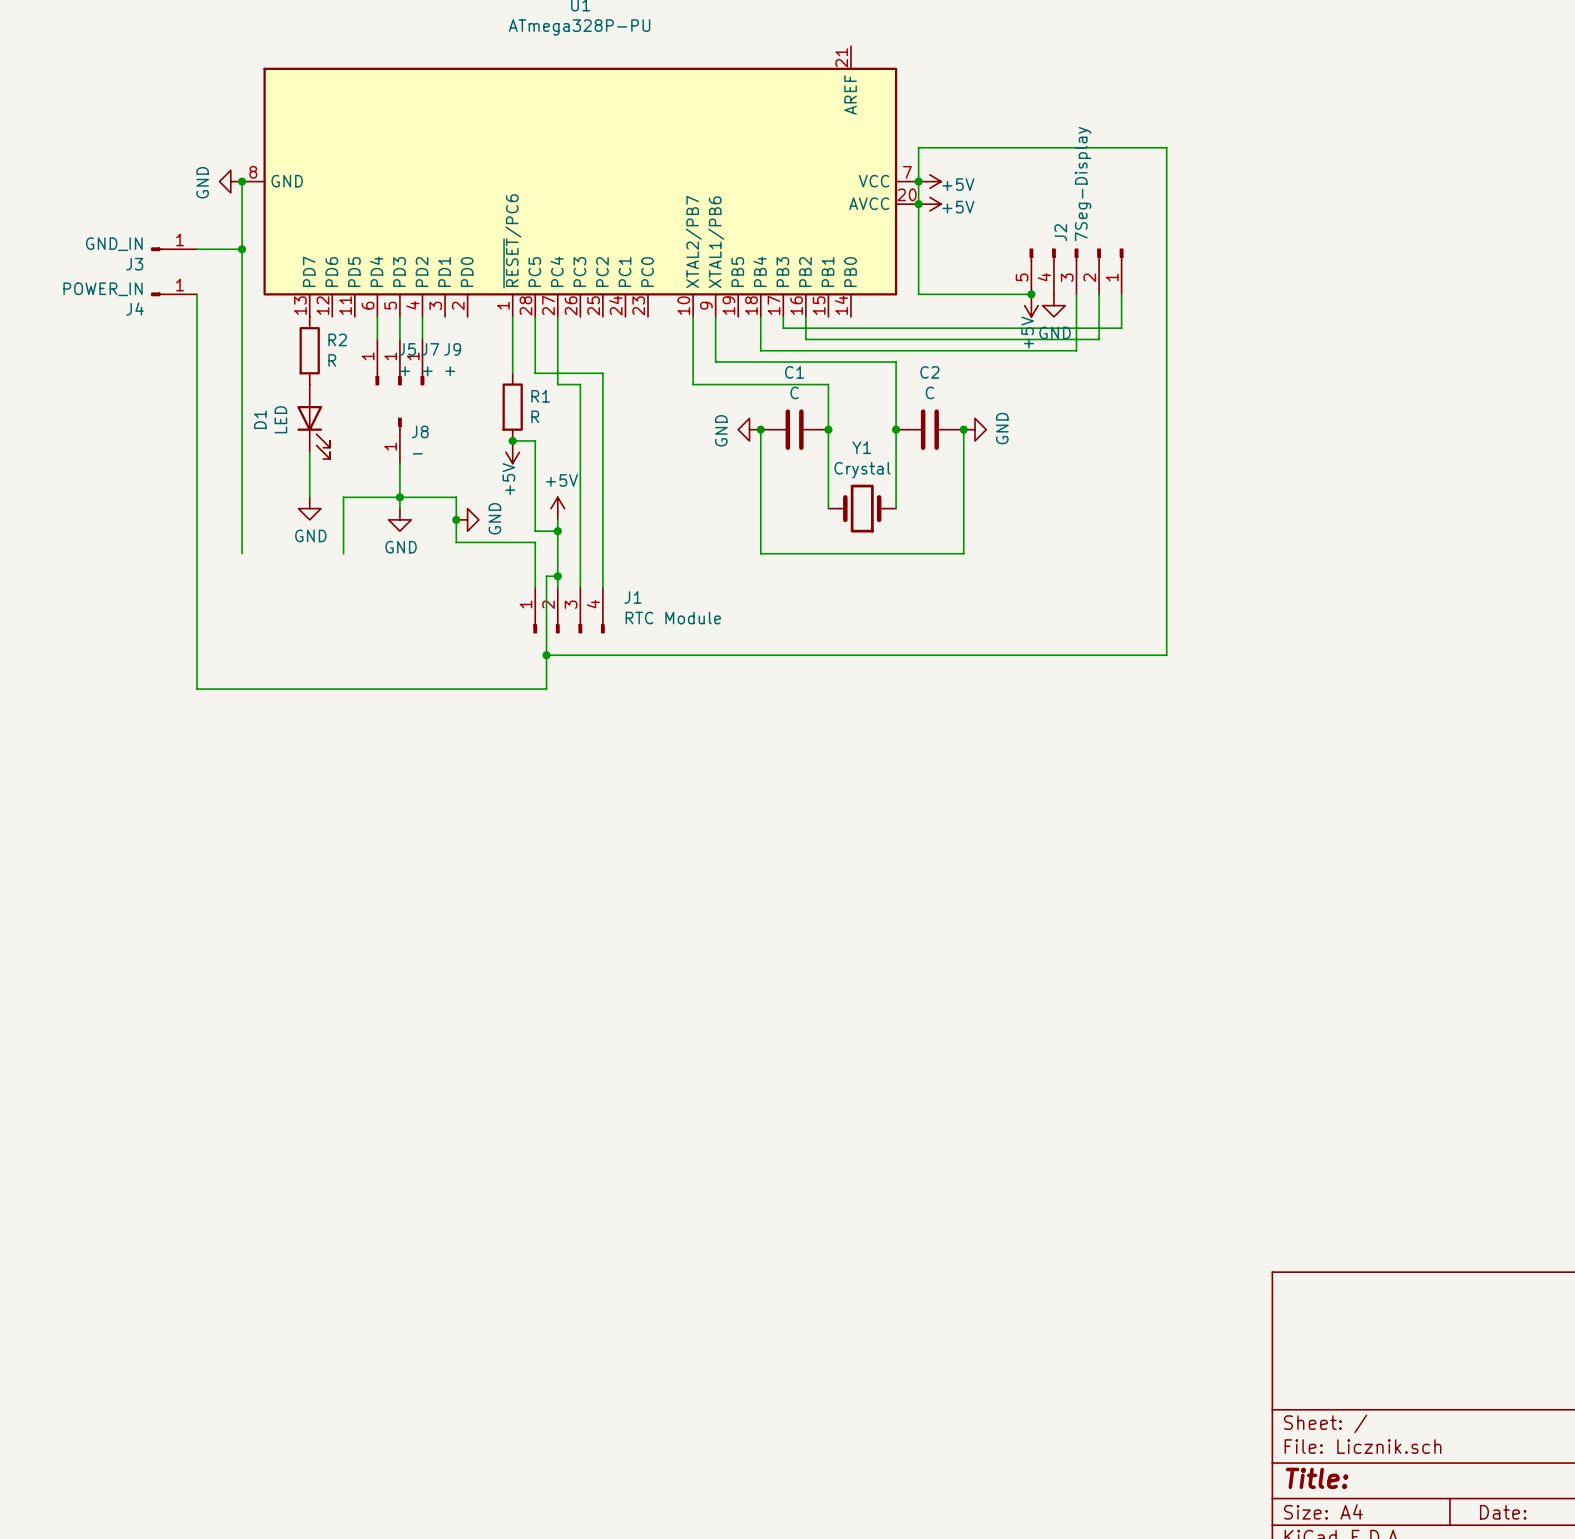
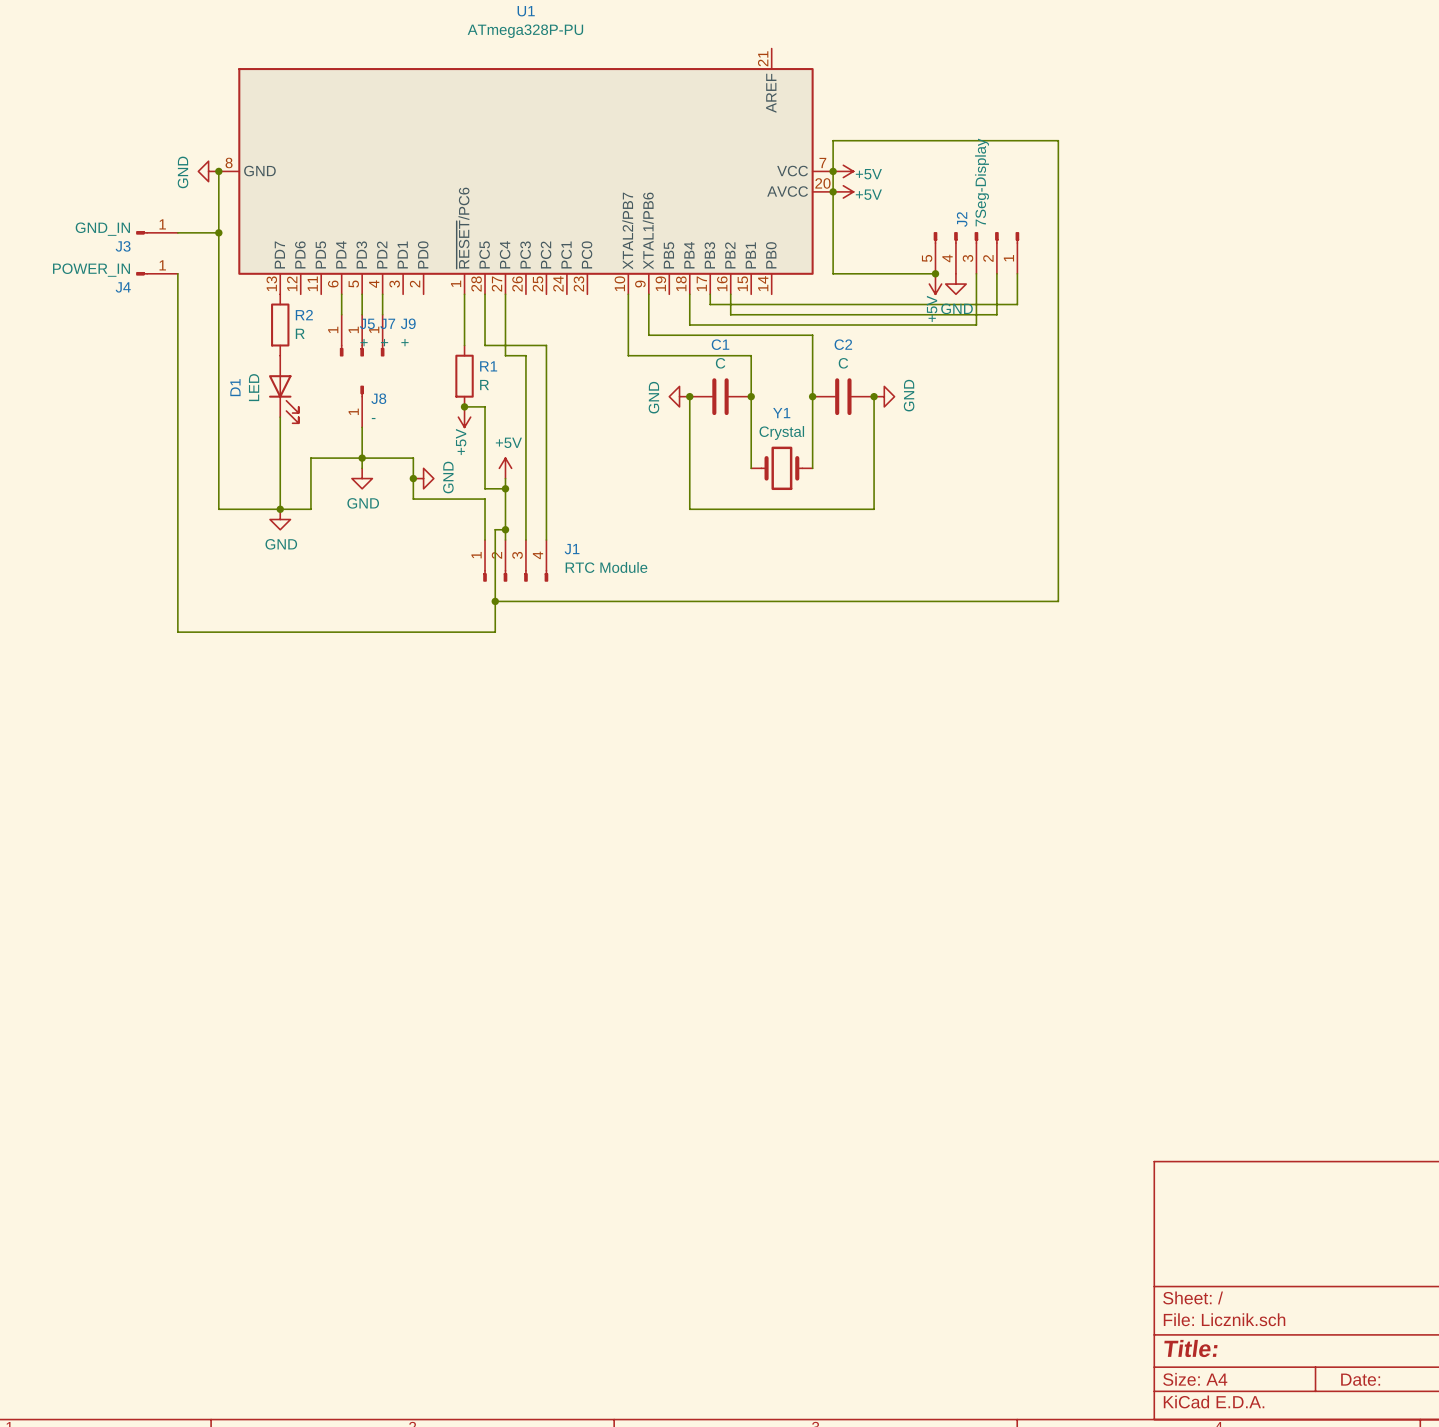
wire: none -> (280, 458) (280, 509)
power symbol position: GND (309, 508) -> GND (280, 519)
wire: none -> (218, 509) (310, 509)
junction: none -> (280, 509)

